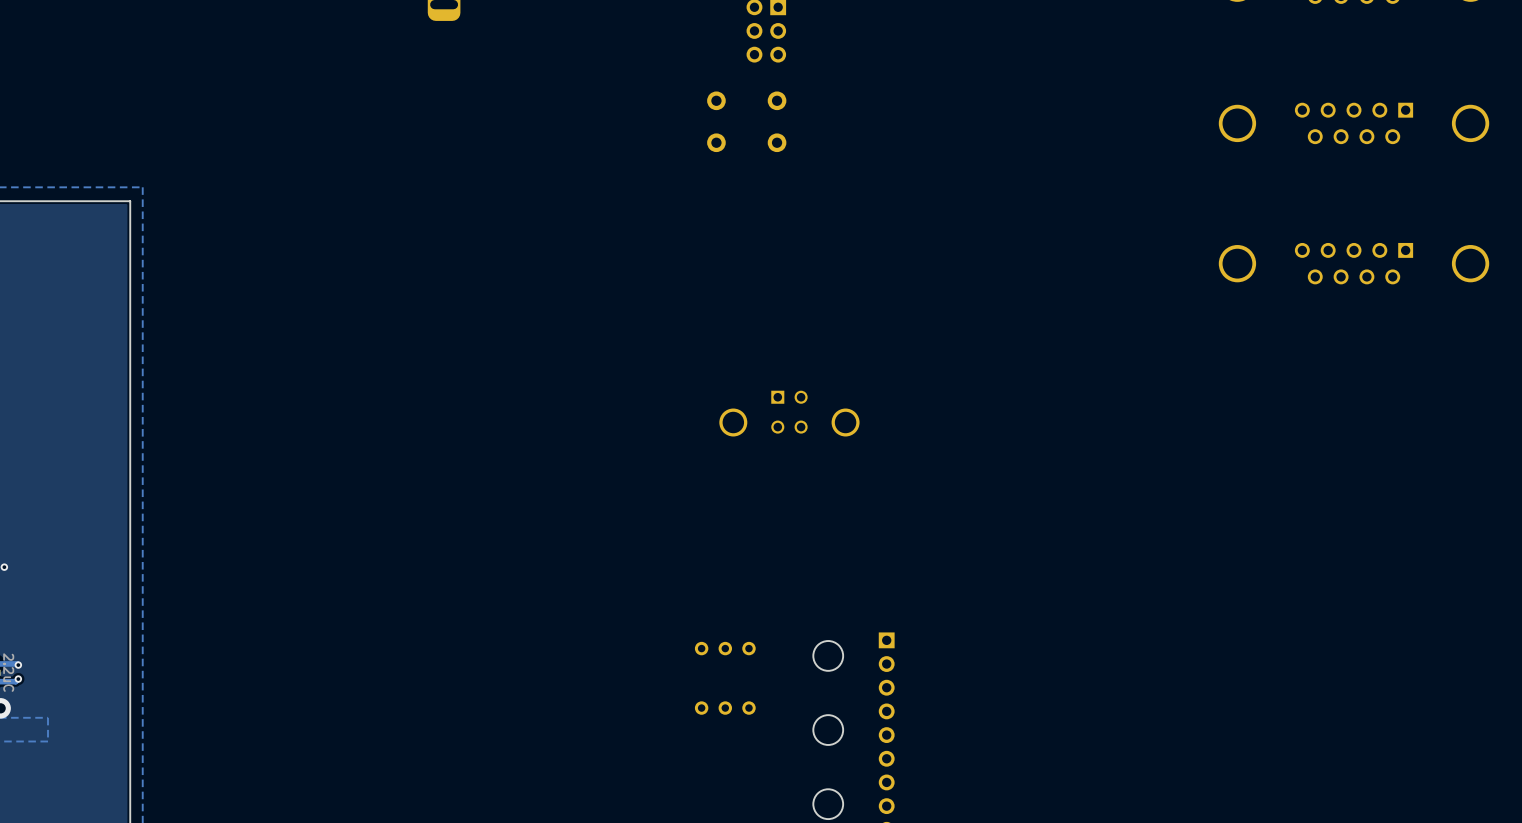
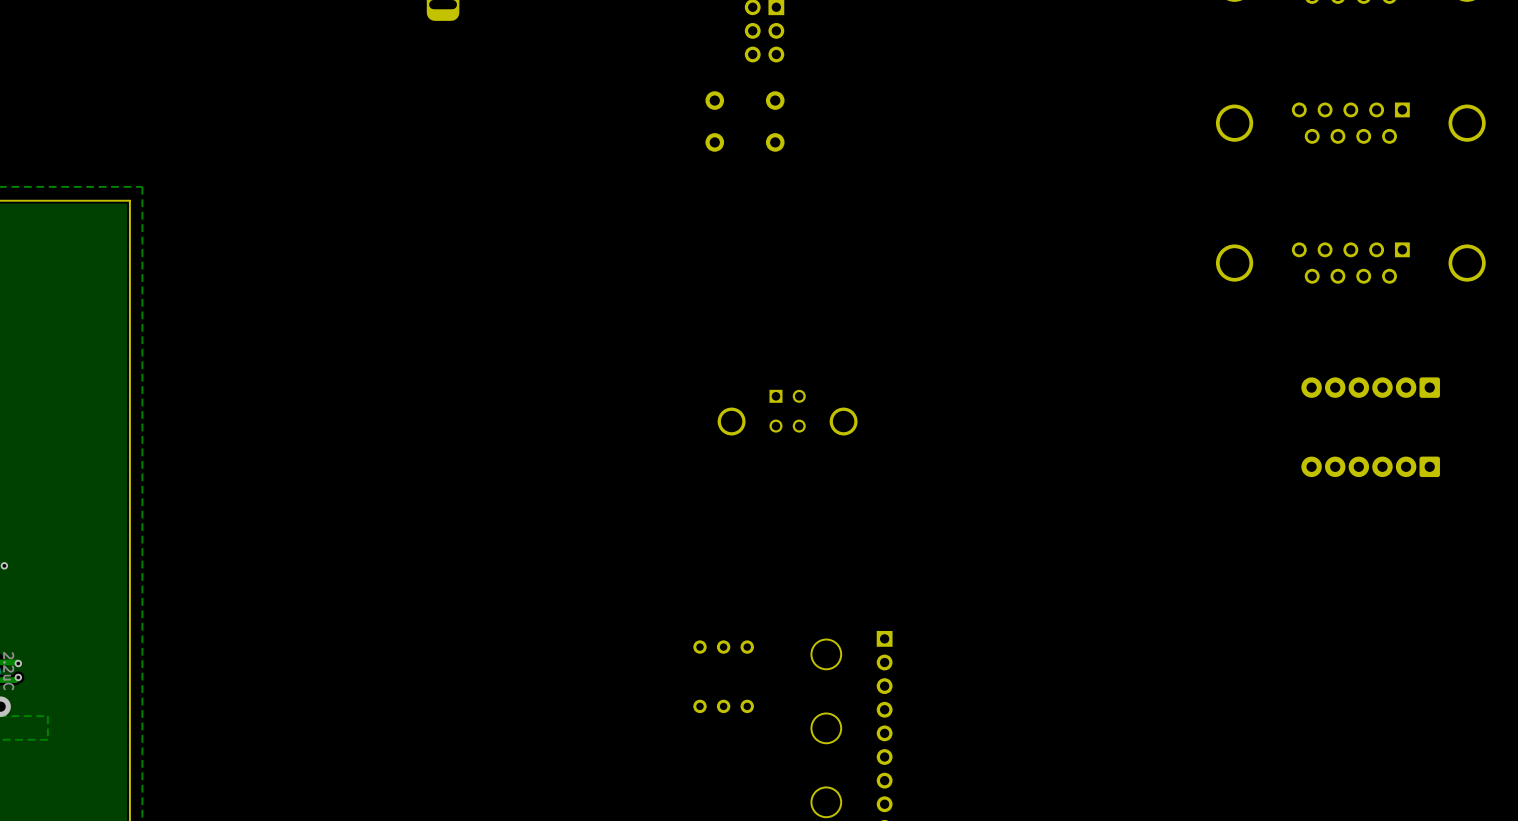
part: none -> (1370, 387)
part: none -> (1370, 466)

